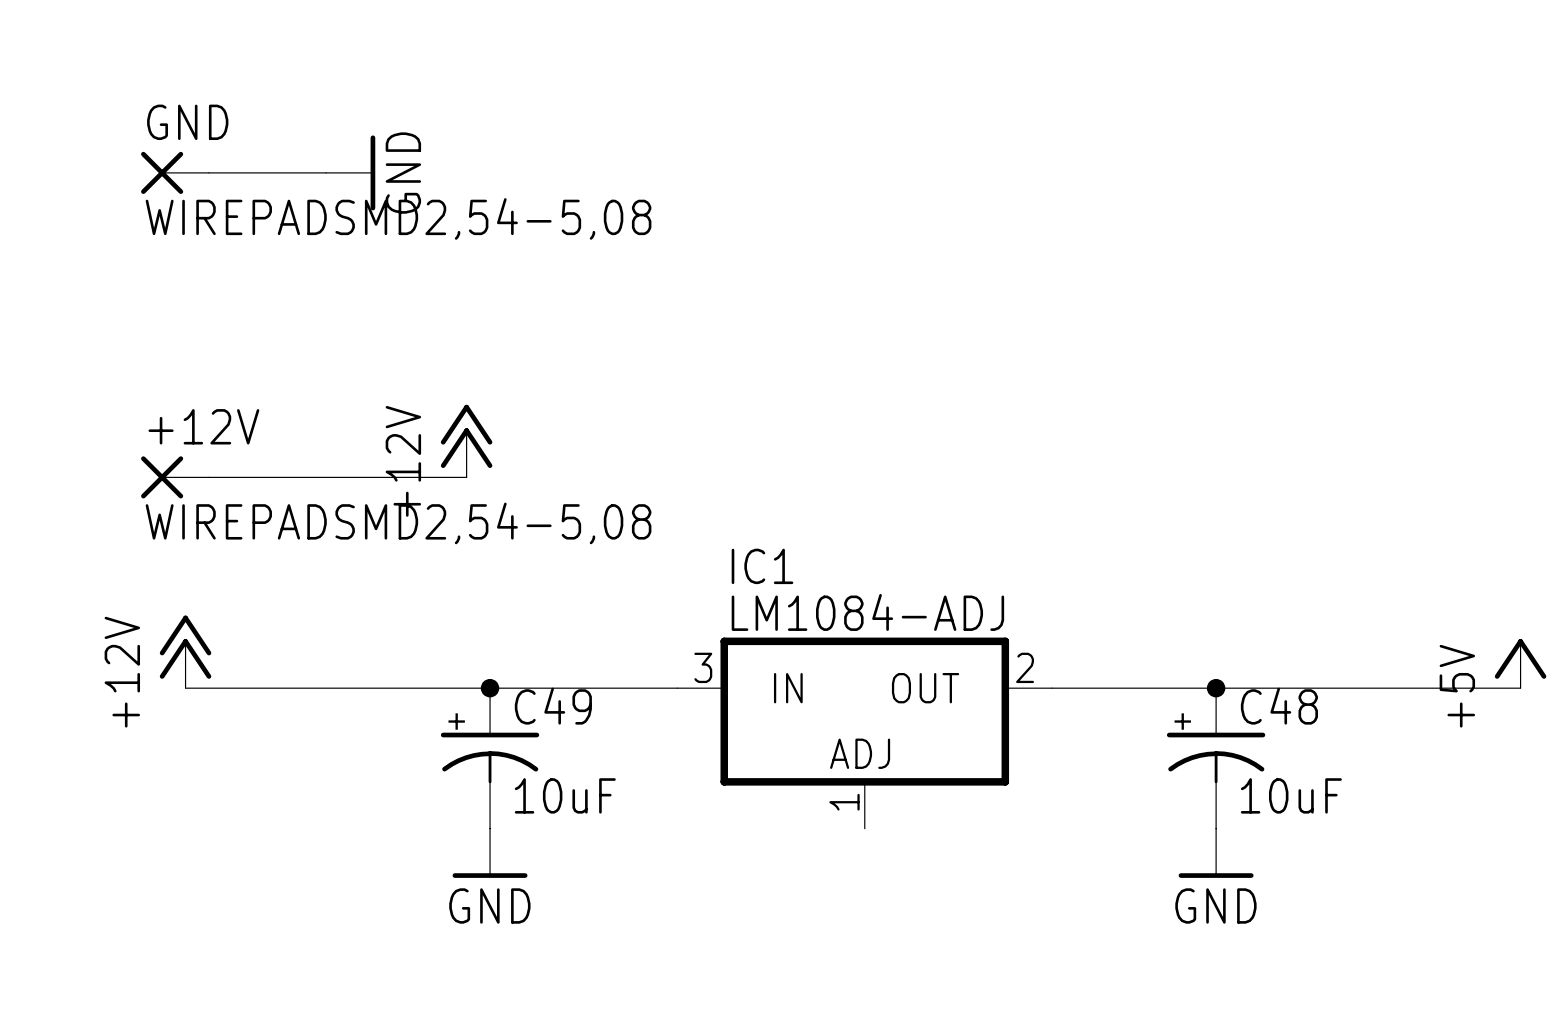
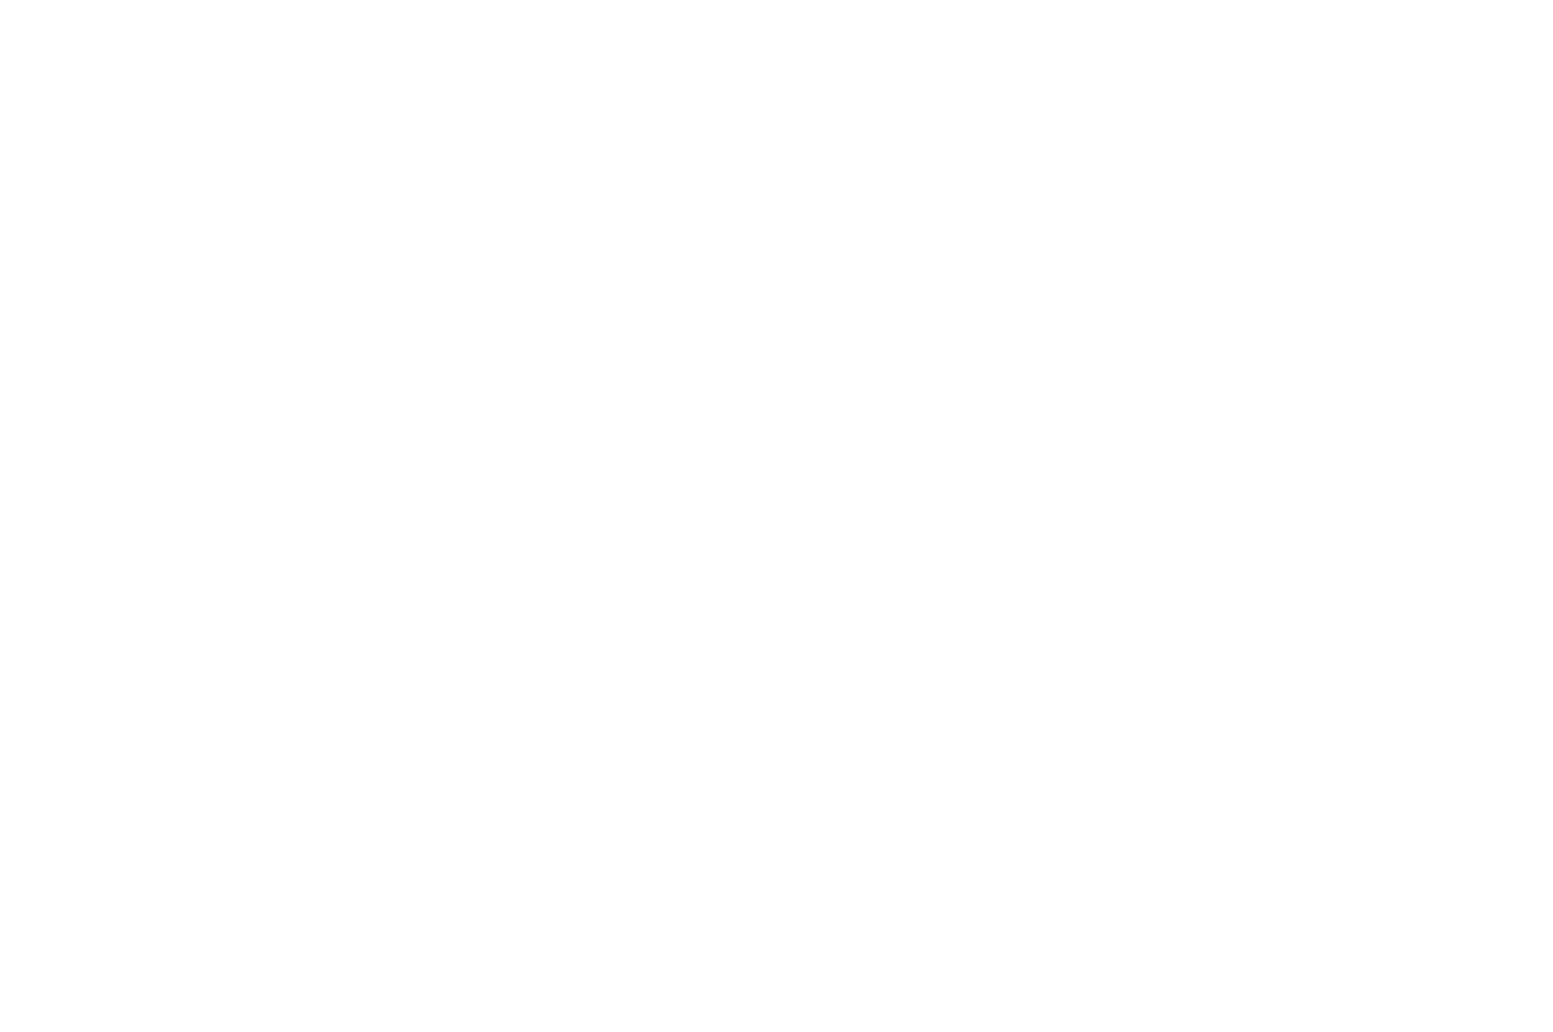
GND: WIREPADSMD2,54-5,08 (175, 172) -> none
wire: (208, 172) (326, 172) -> none
power symbol: GND (350, 172) -> none
power symbol: +12V (466, 441) -> none
+12V: WIREPADSMD2,54-5,08 (175, 477) -> none
wire: (208, 477) (466, 477) -> none
power symbol: +12V (185, 651) -> none
power symbol: +5V (1520, 663) -> none
wire: (185, 688) (677, 688) -> none
junction: (490, 688) -> none
wire: (1052, 688) (1520, 688) -> none
junction: (1216, 688) -> none
IC1: LM1084-ADJ (864, 733) -> none
C49: 10uF (490, 758) -> none
C48: 10uF (1216, 758) -> none
power symbol: GND (490, 853) -> none
power symbol: GND (1216, 853) -> none

